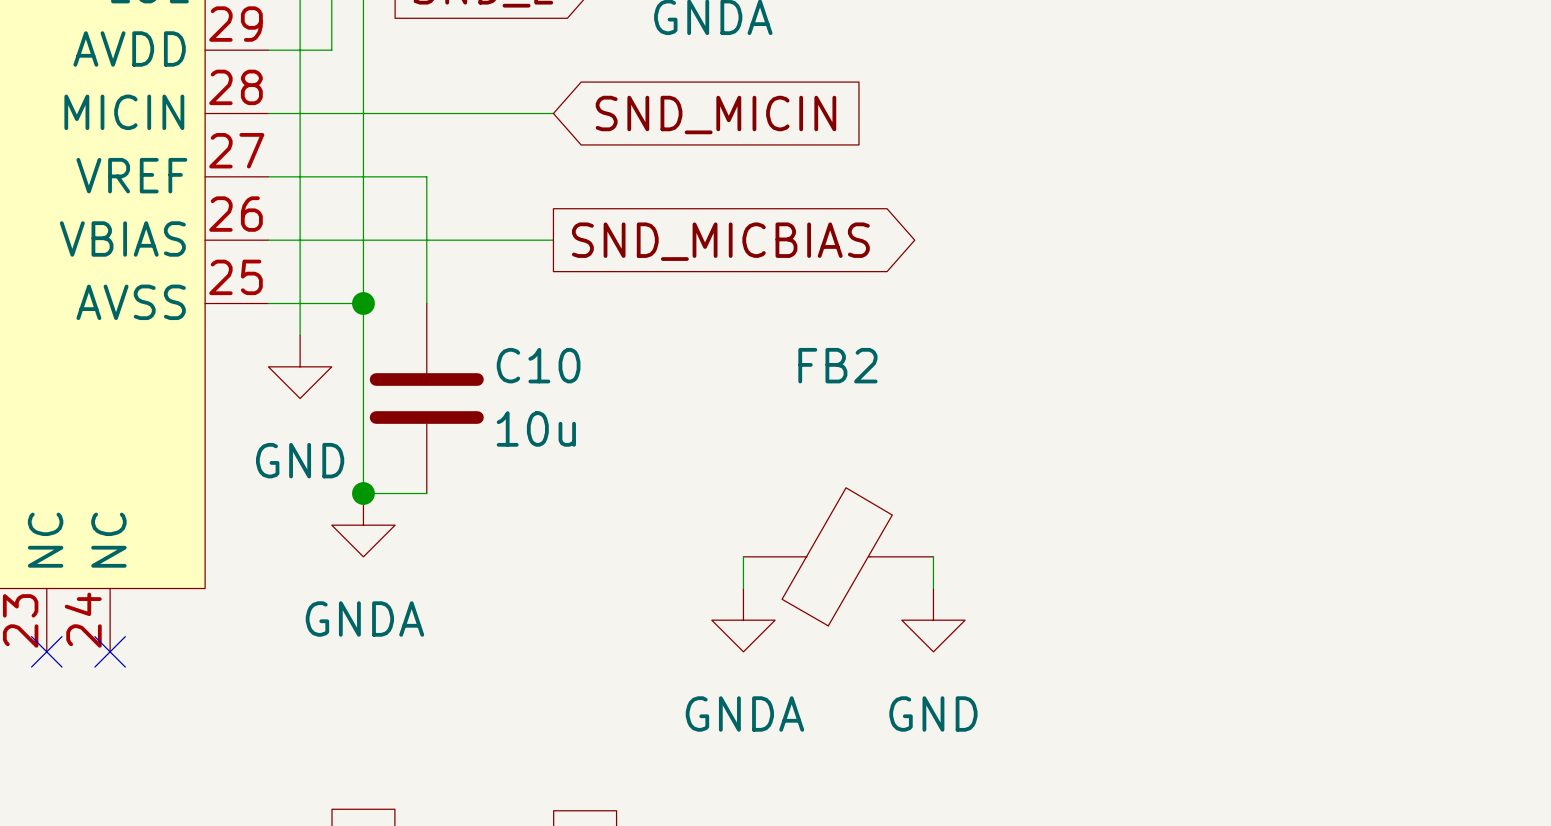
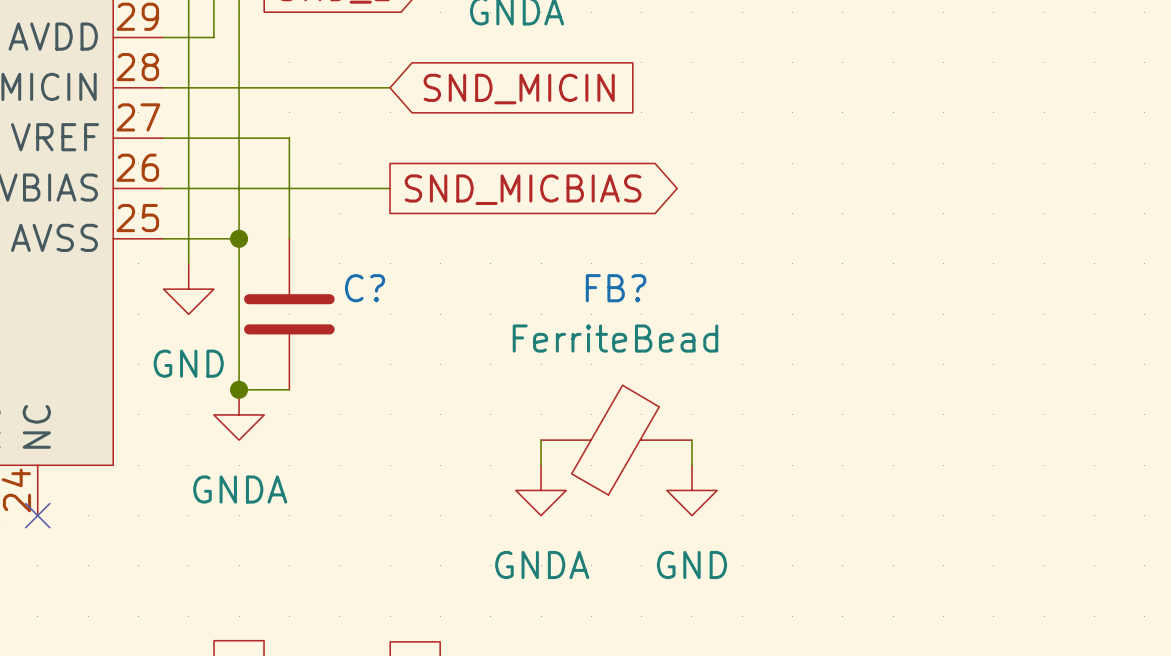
C10 name: C10 (538, 365) -> C? (365, 288)
FB2 name: FB2 (837, 365) -> FB? (616, 288)
C10 value: 10u (536, 428) -> none
FB2 value: none -> FerriteBead (615, 338)

